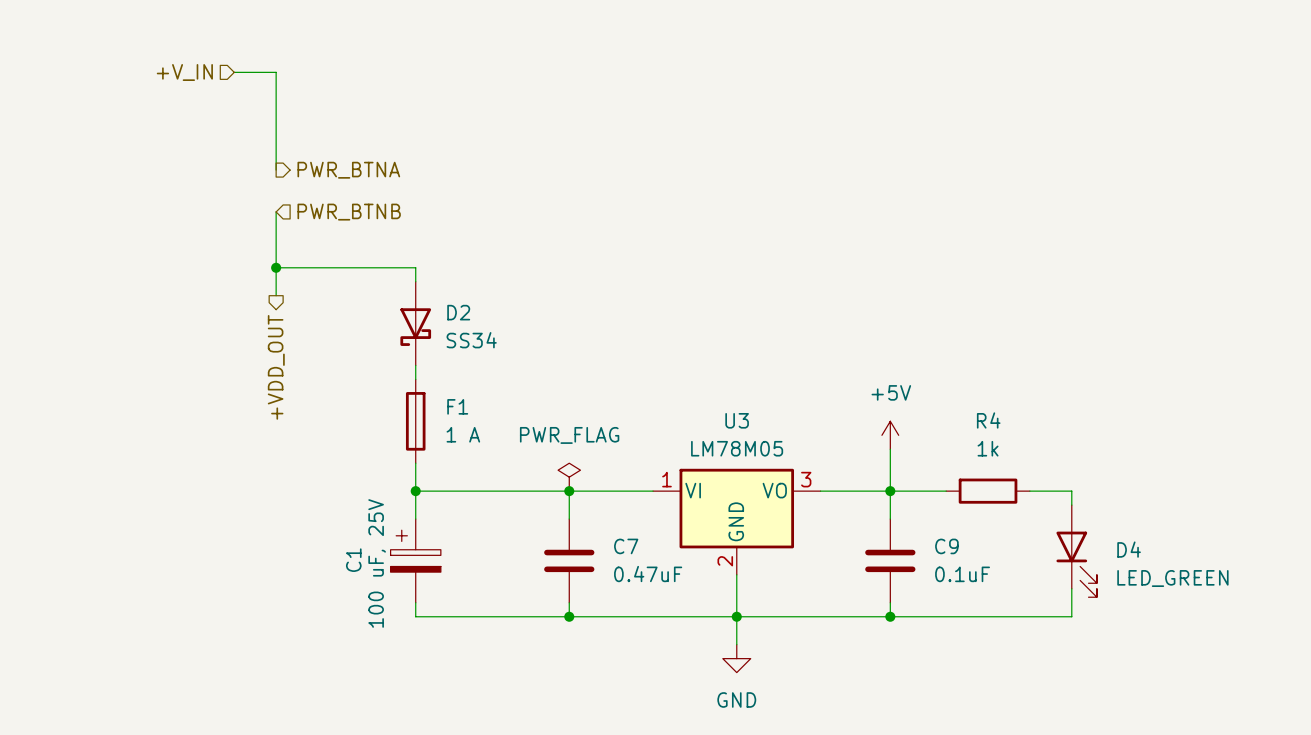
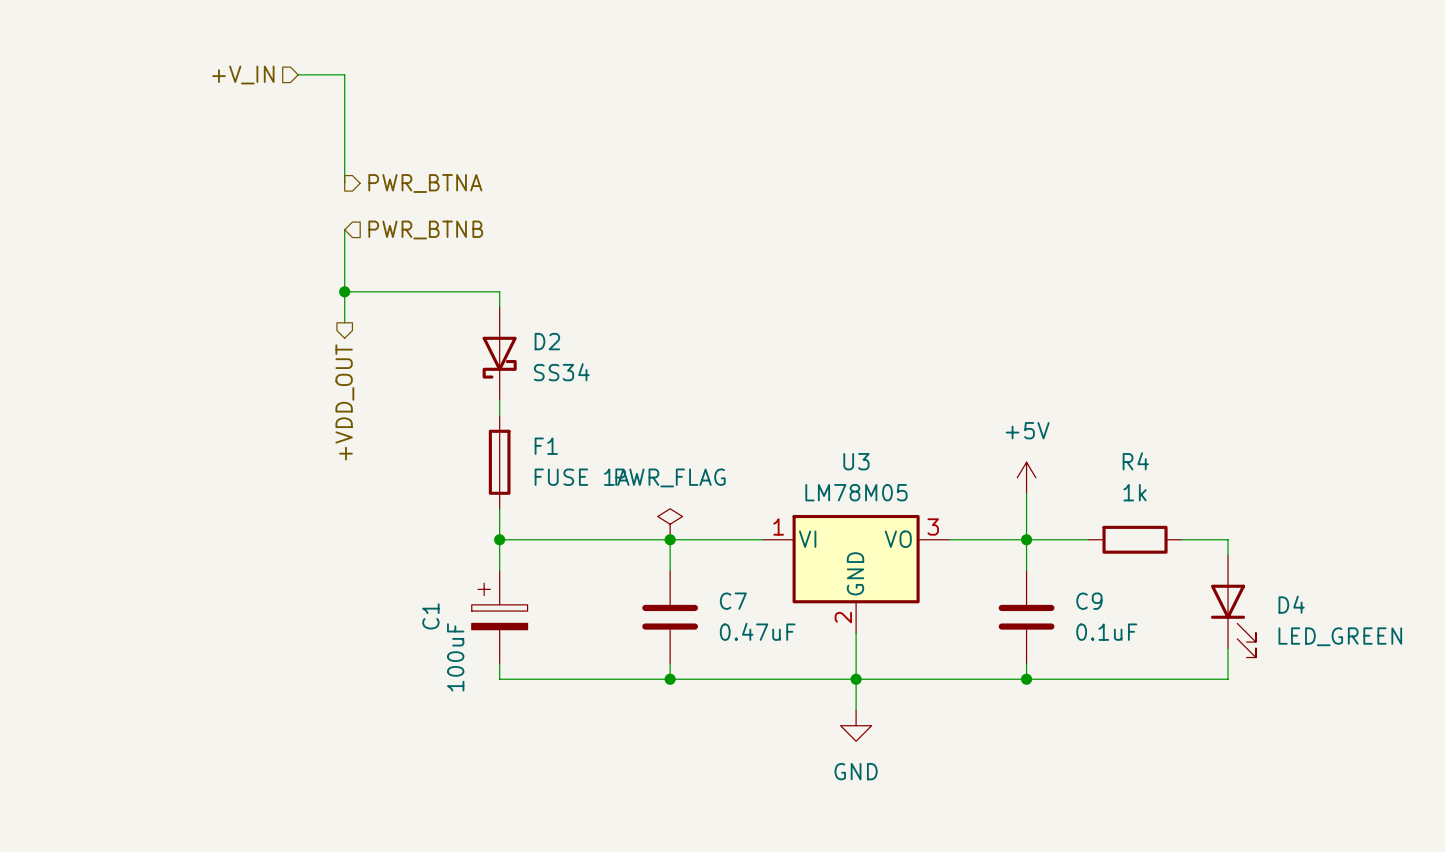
F1 value: 1 A (463, 434) -> FUSE 1A (582, 477)
C1 value: 100 uF, 25V (377, 563) -> 100uF (455, 657)

